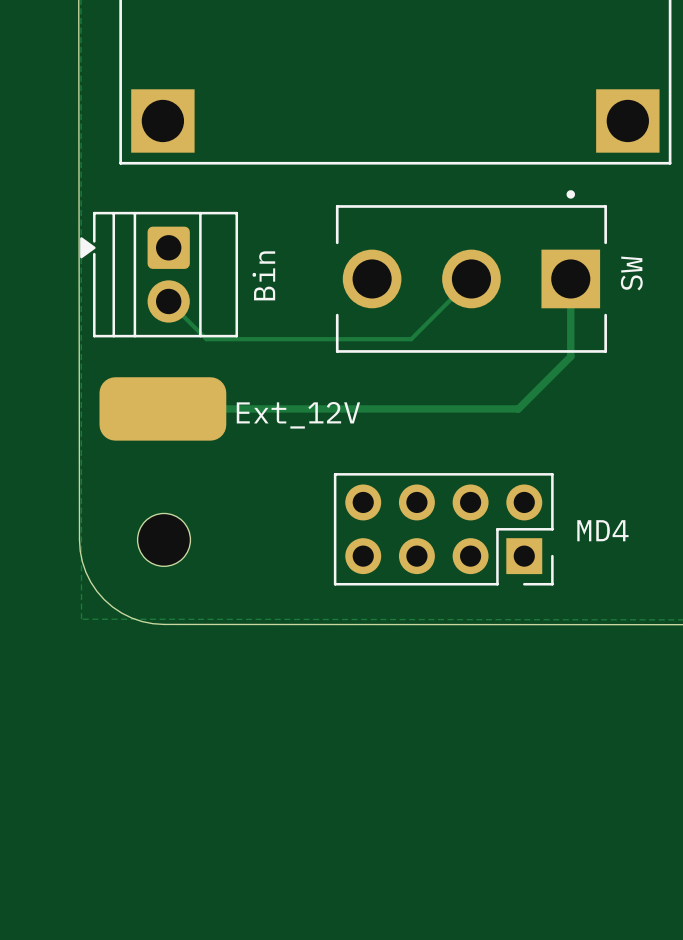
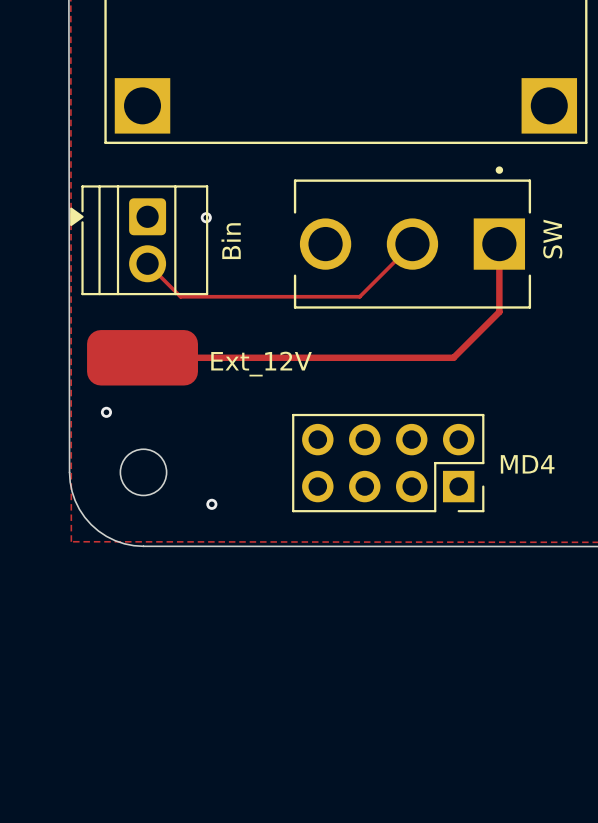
via: none -> (206, 217)
via: none -> (106, 412)
via: none -> (211, 504)

